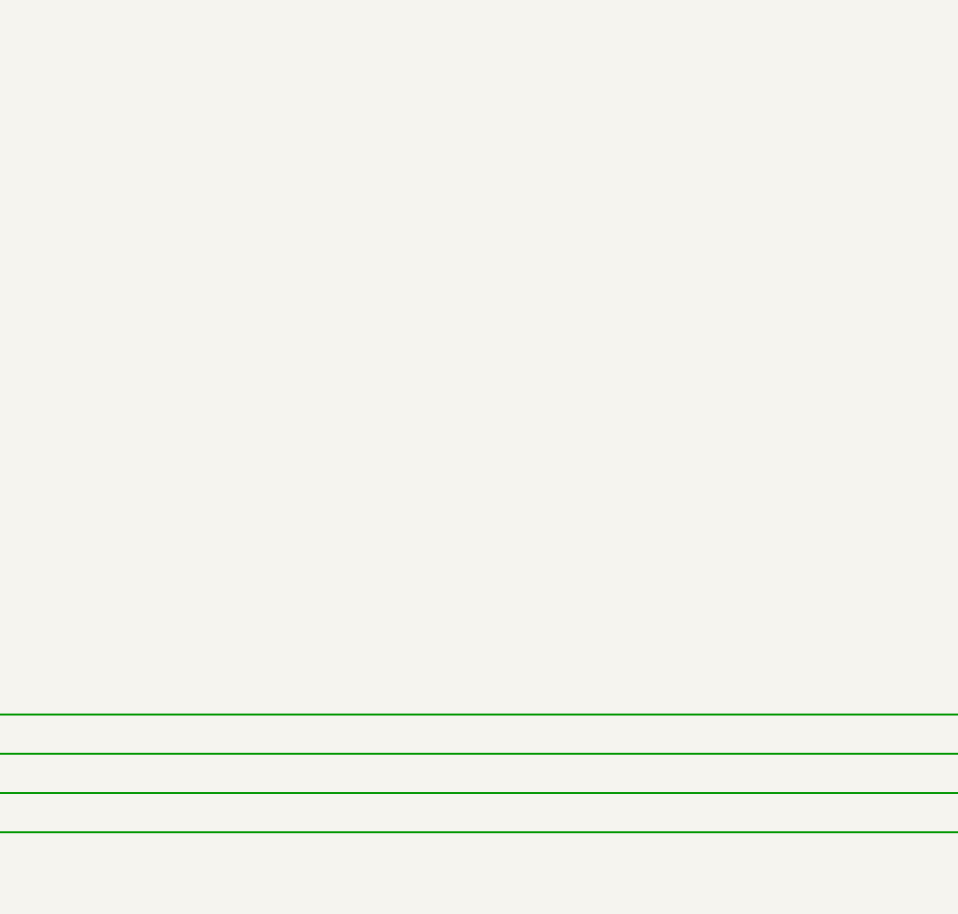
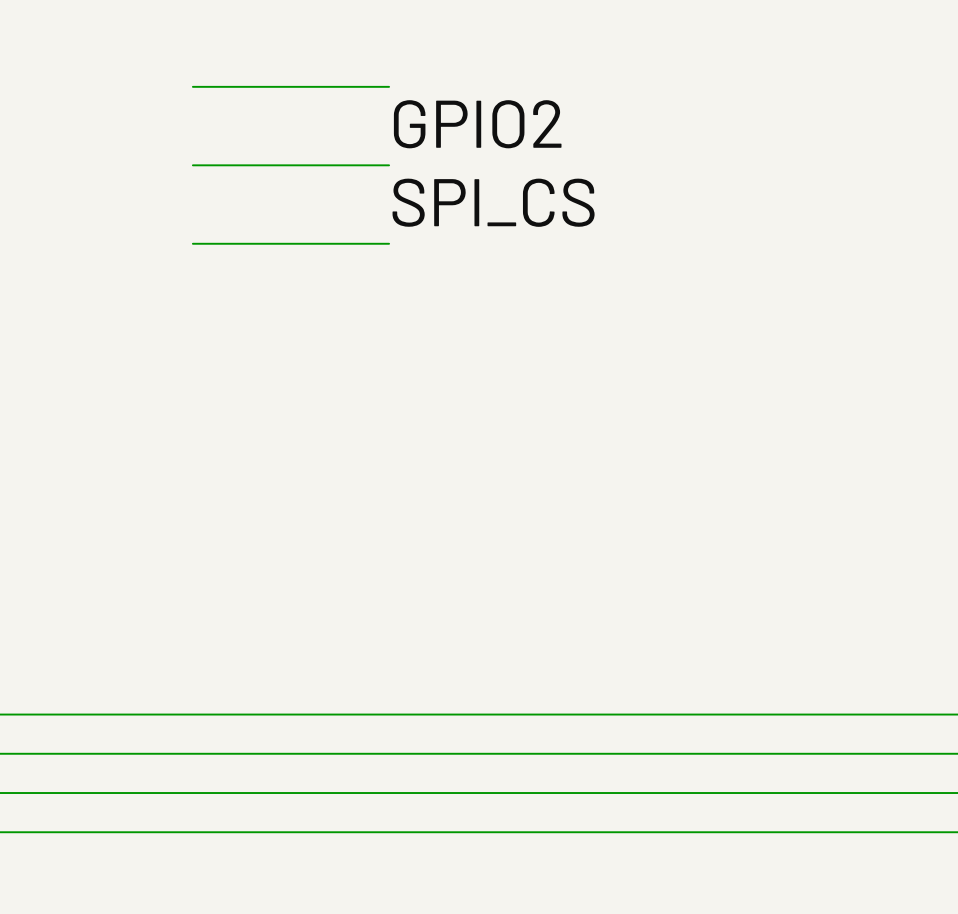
wire: none -> (192, 86) (389, 86)
label: none -> GPIO2 (477, 124)
wire: none -> (192, 165) (389, 165)
label: none -> SPI_CS (493, 202)
wire: none -> (192, 243) (389, 243)

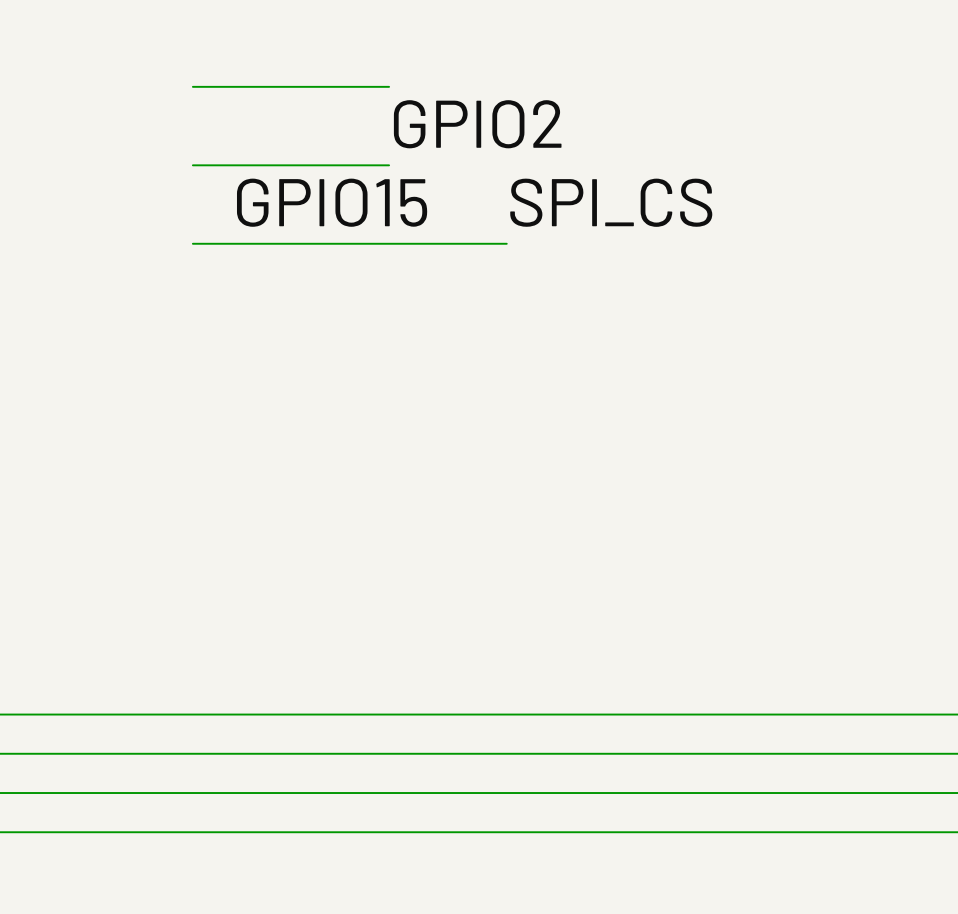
label: none -> GPIO15 (332, 202)
label position: SPI_CS (493, 202) -> SPI_CS (611, 202)
wire: none -> (389, 243) (506, 243)

